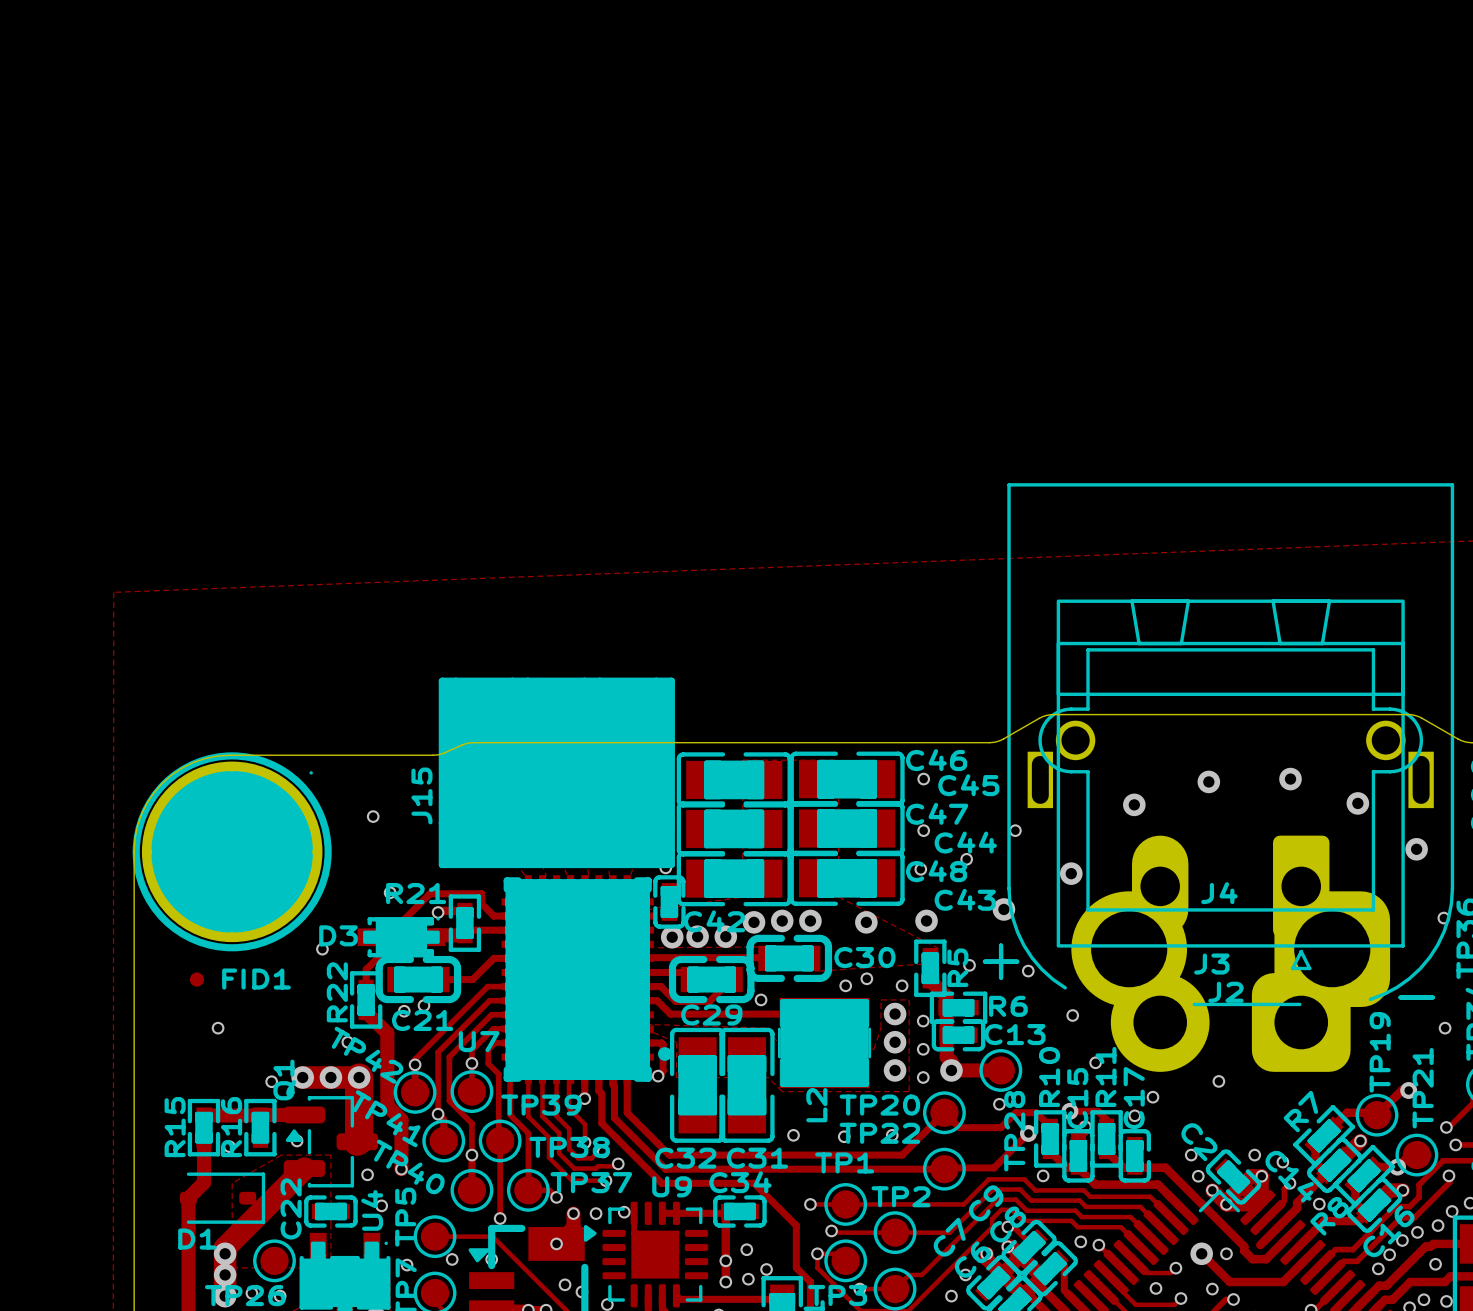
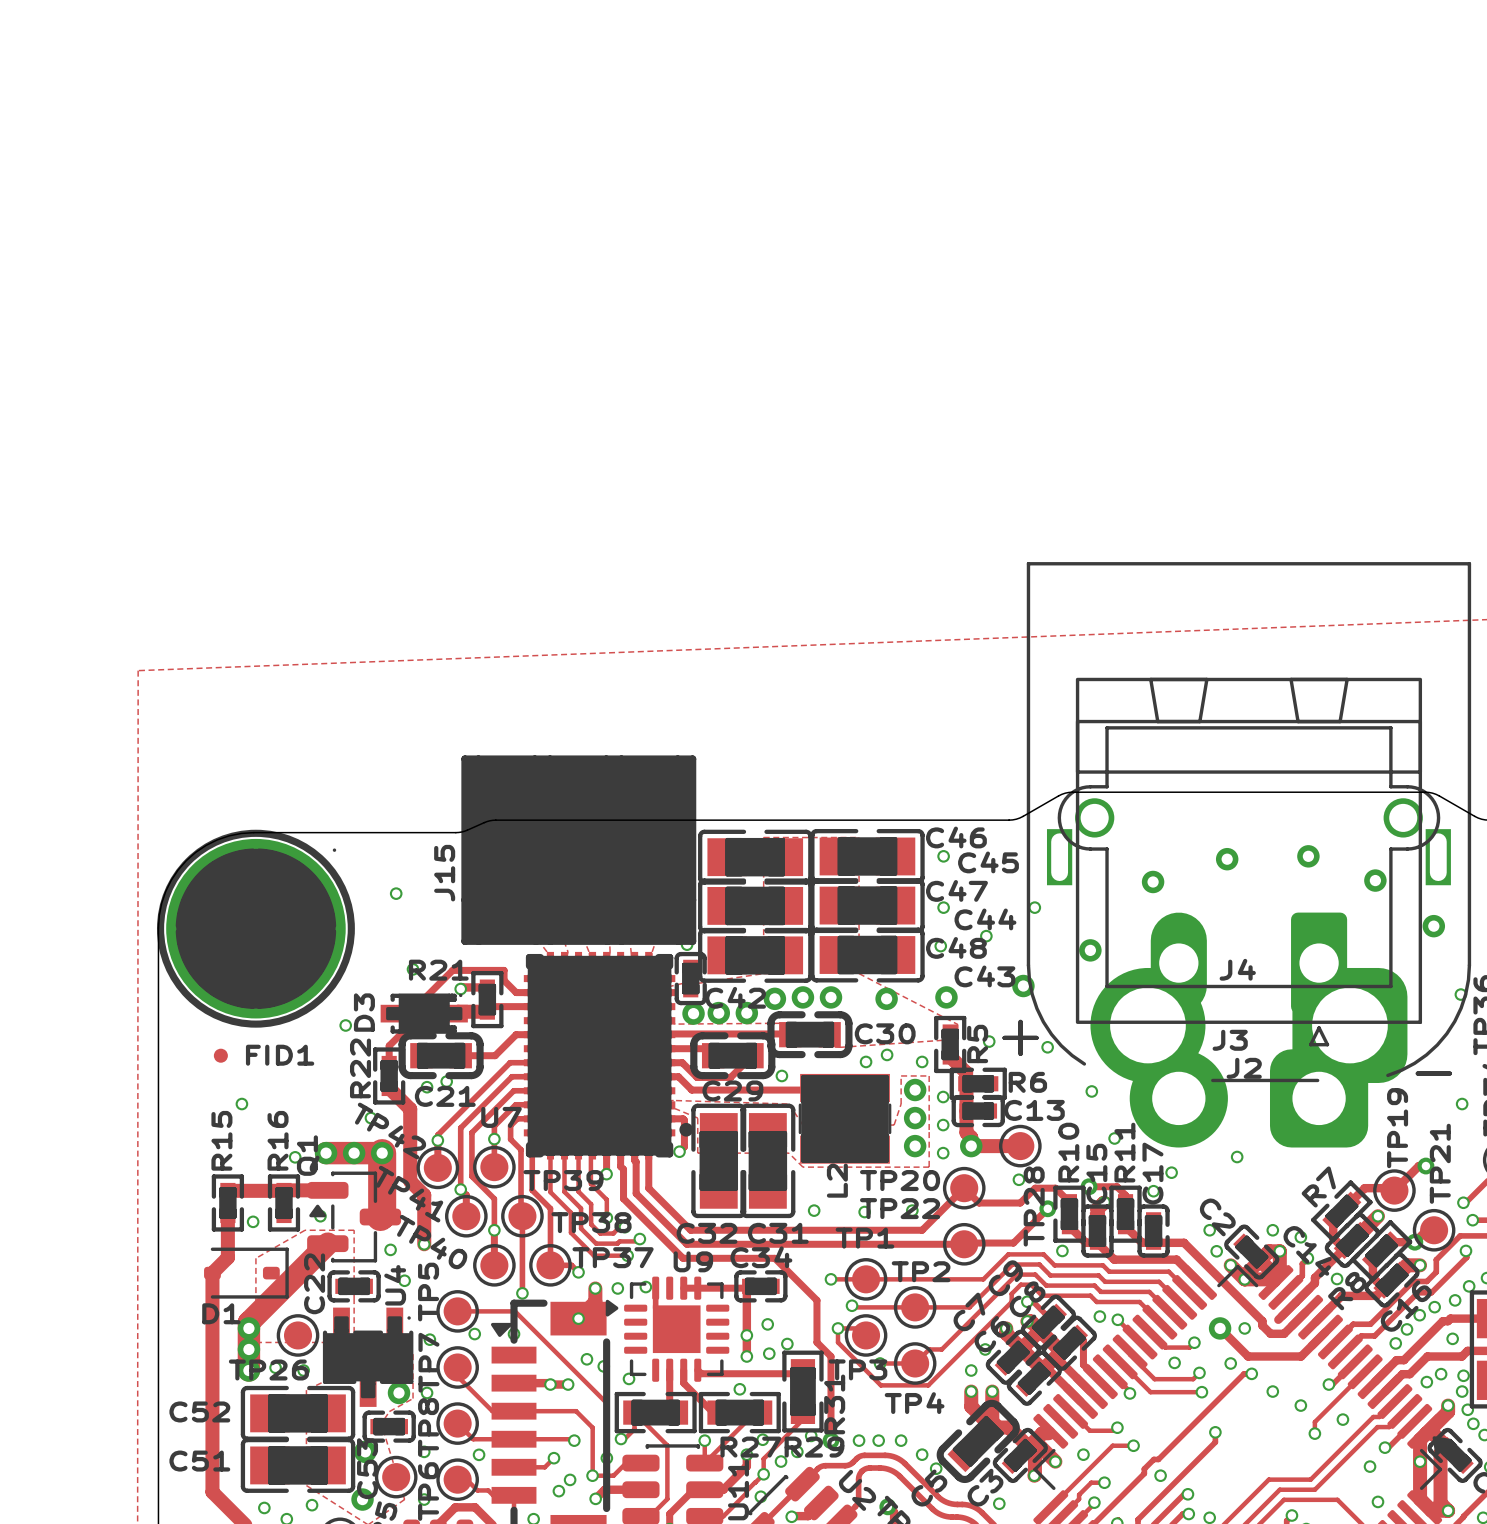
D3 name rotation: 0° (338, 935) -> 90° counterclockwise (364, 1012)
R15 name position: R15 (175, 1127) -> R15 (221, 1140)
R16 name position: R16 (231, 1127) -> R16 (278, 1140)

